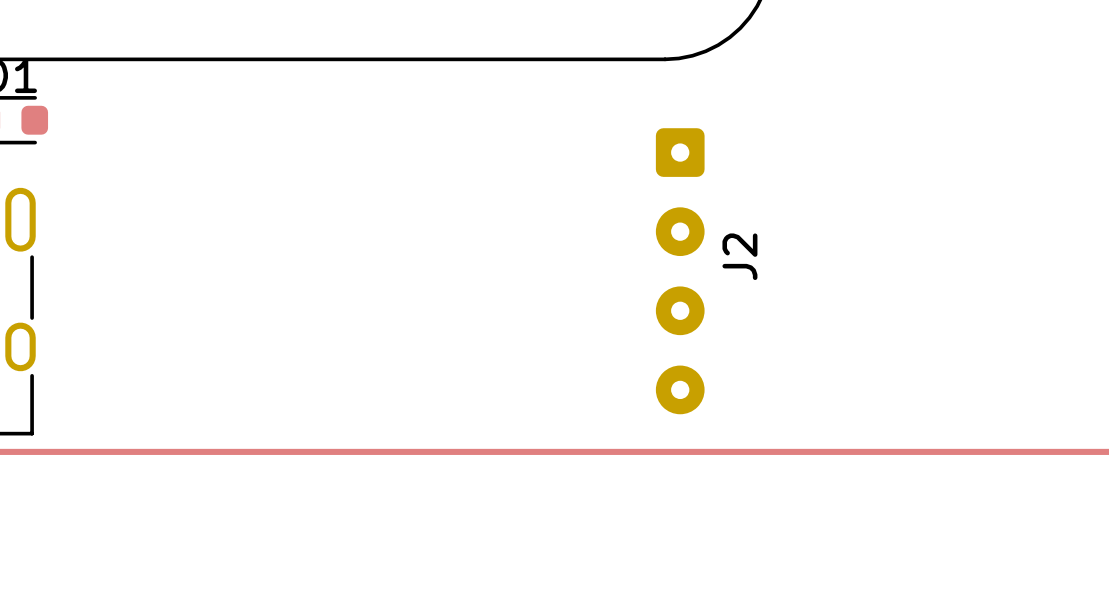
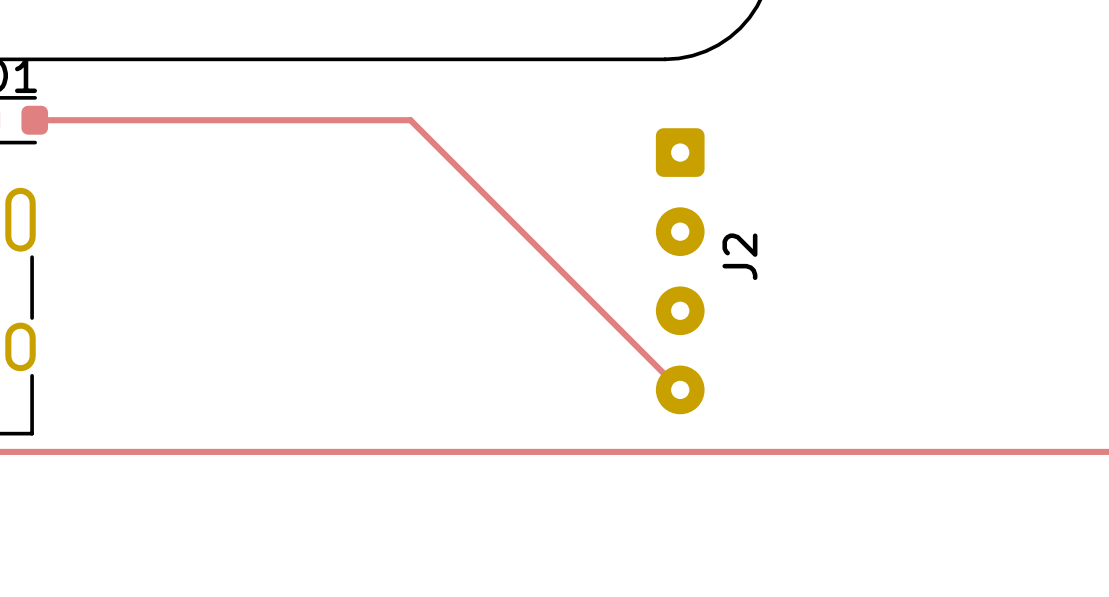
track: none -> (34, 120) (410, 120) (680, 389)

